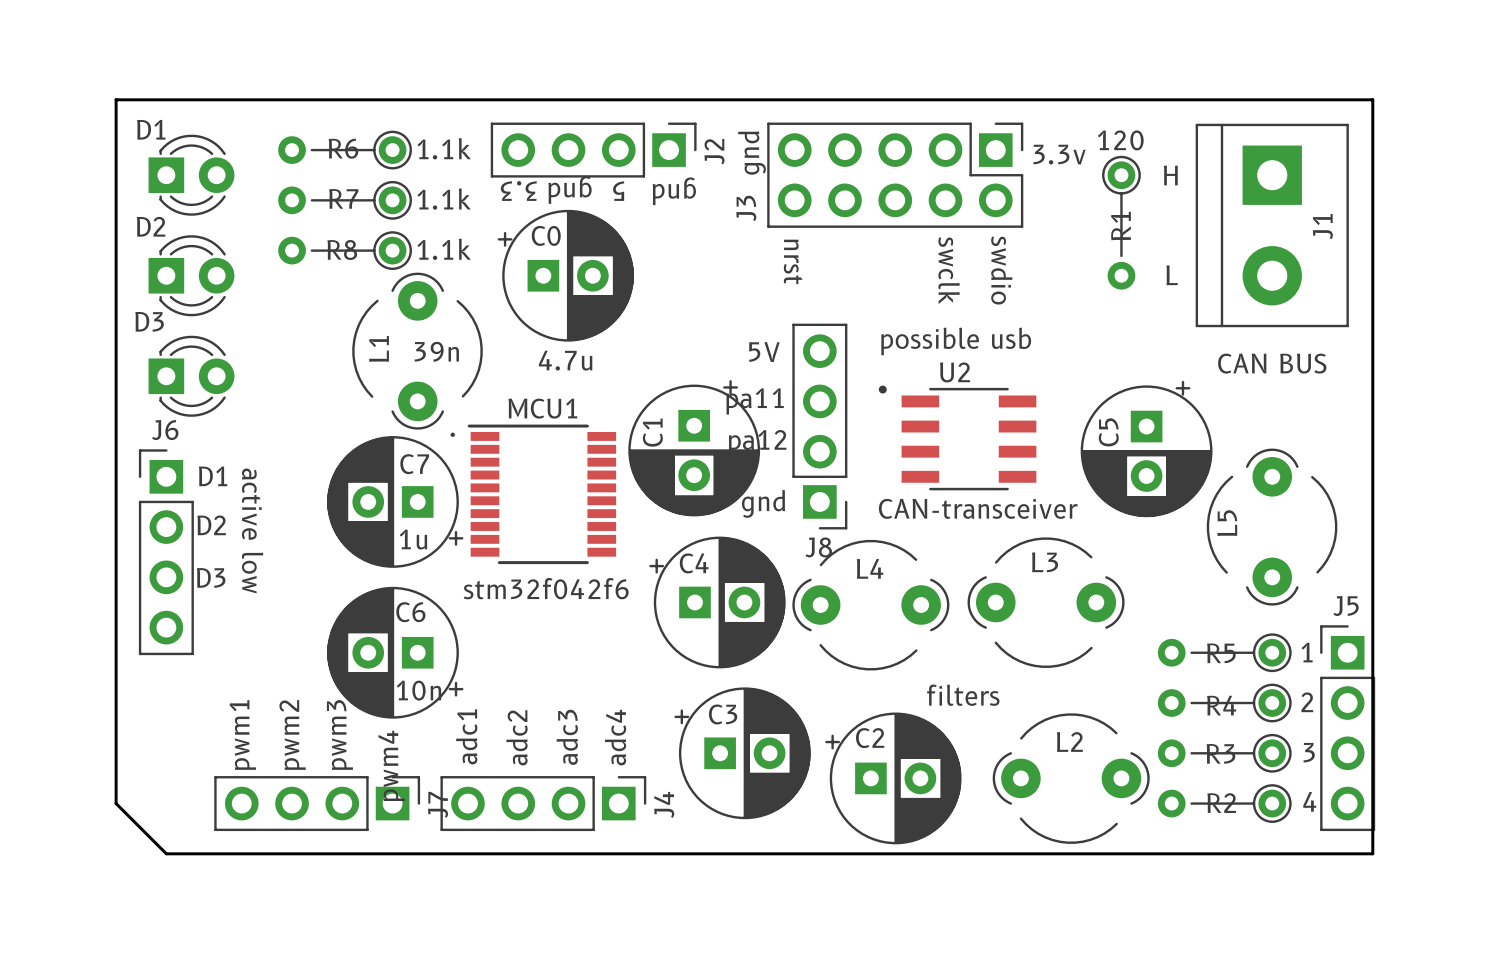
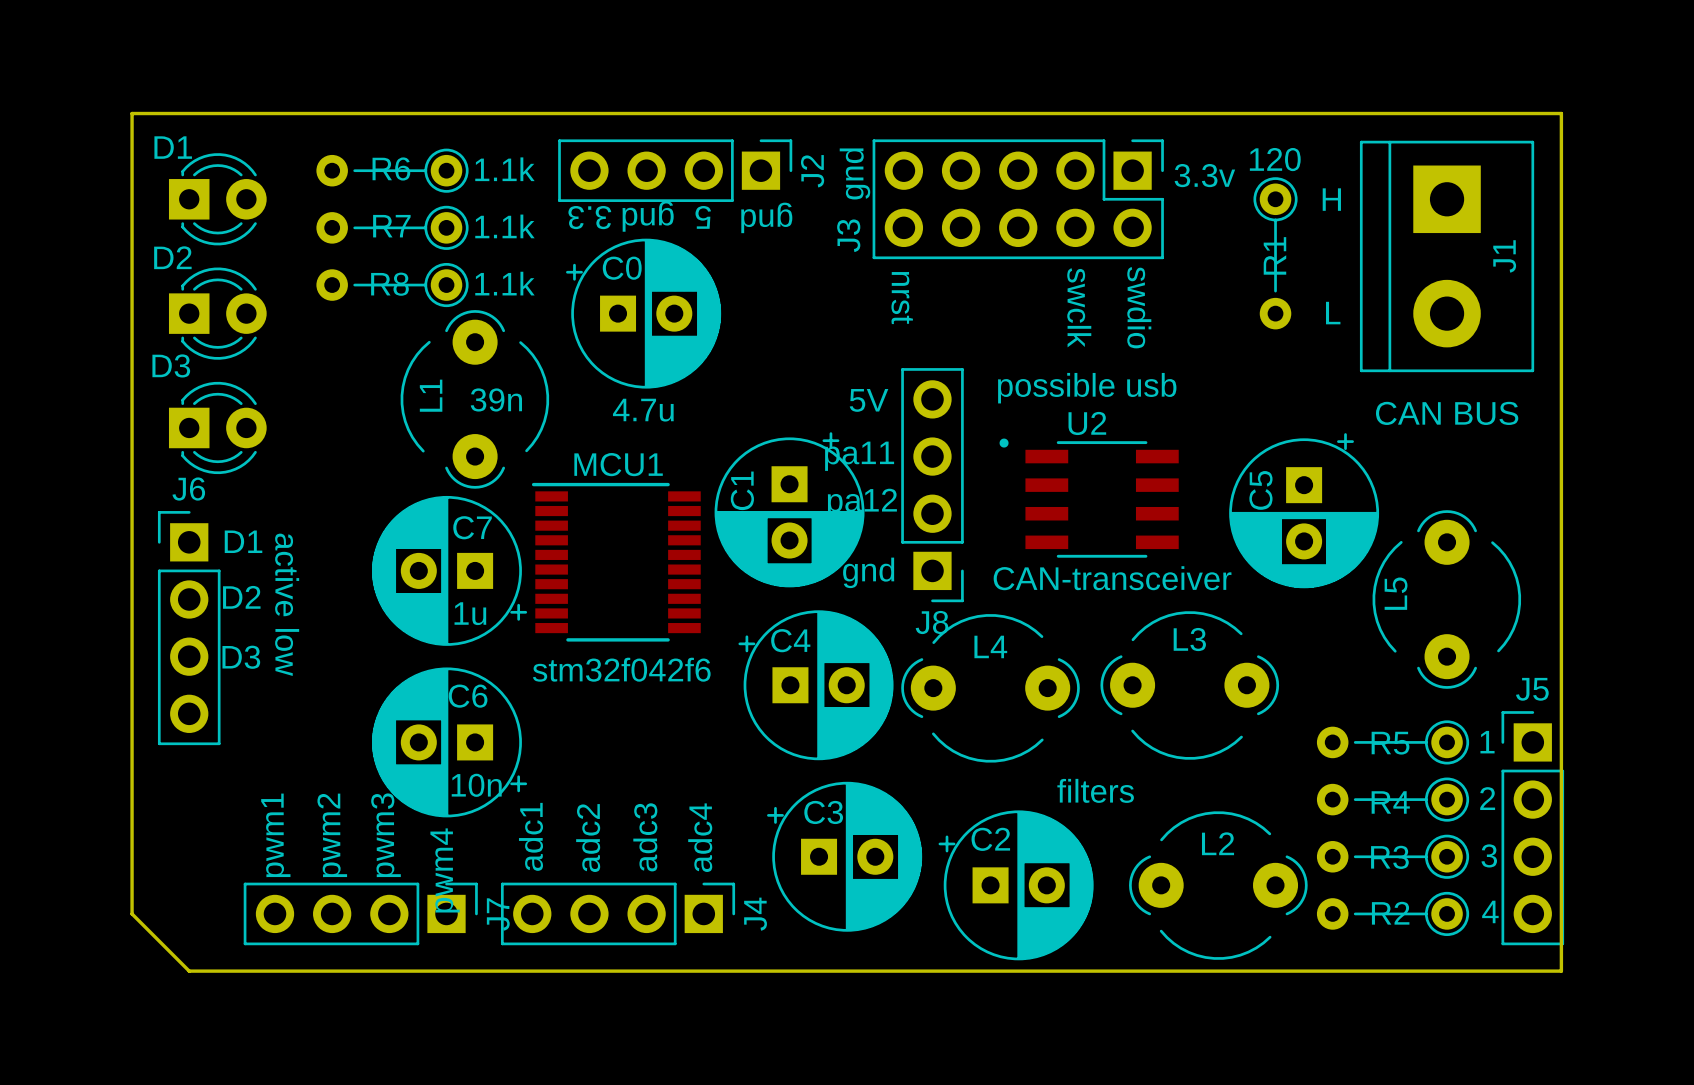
text: . (452, 434) -> none

